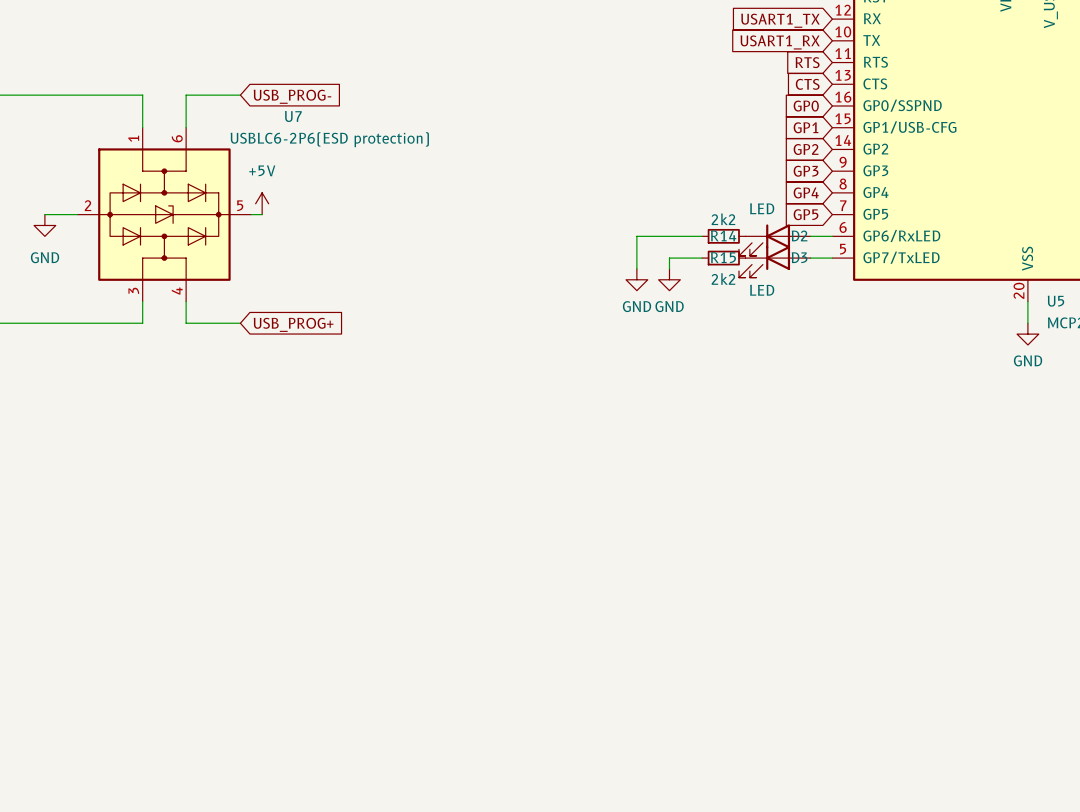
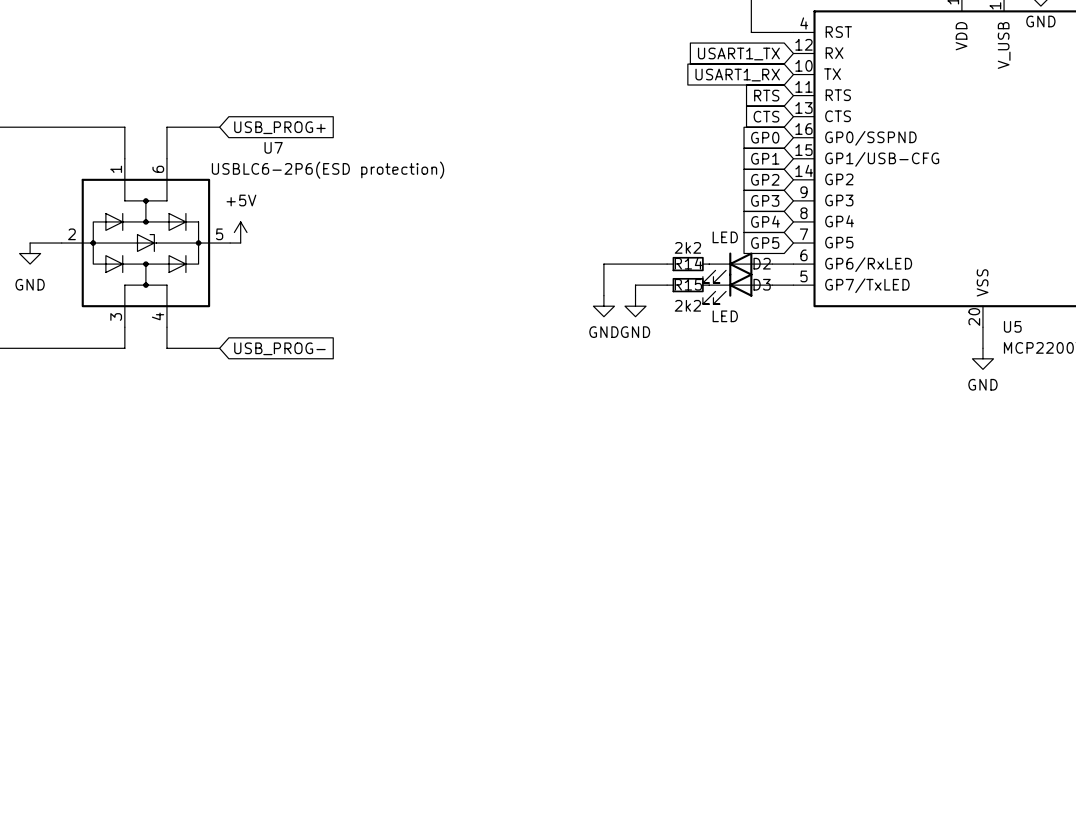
global label: USB_PROG- (292, 96) -> USB_PROG+ (279, 127)
global label: USB_PROG+ (293, 324) -> USB_PROG- (279, 348)

